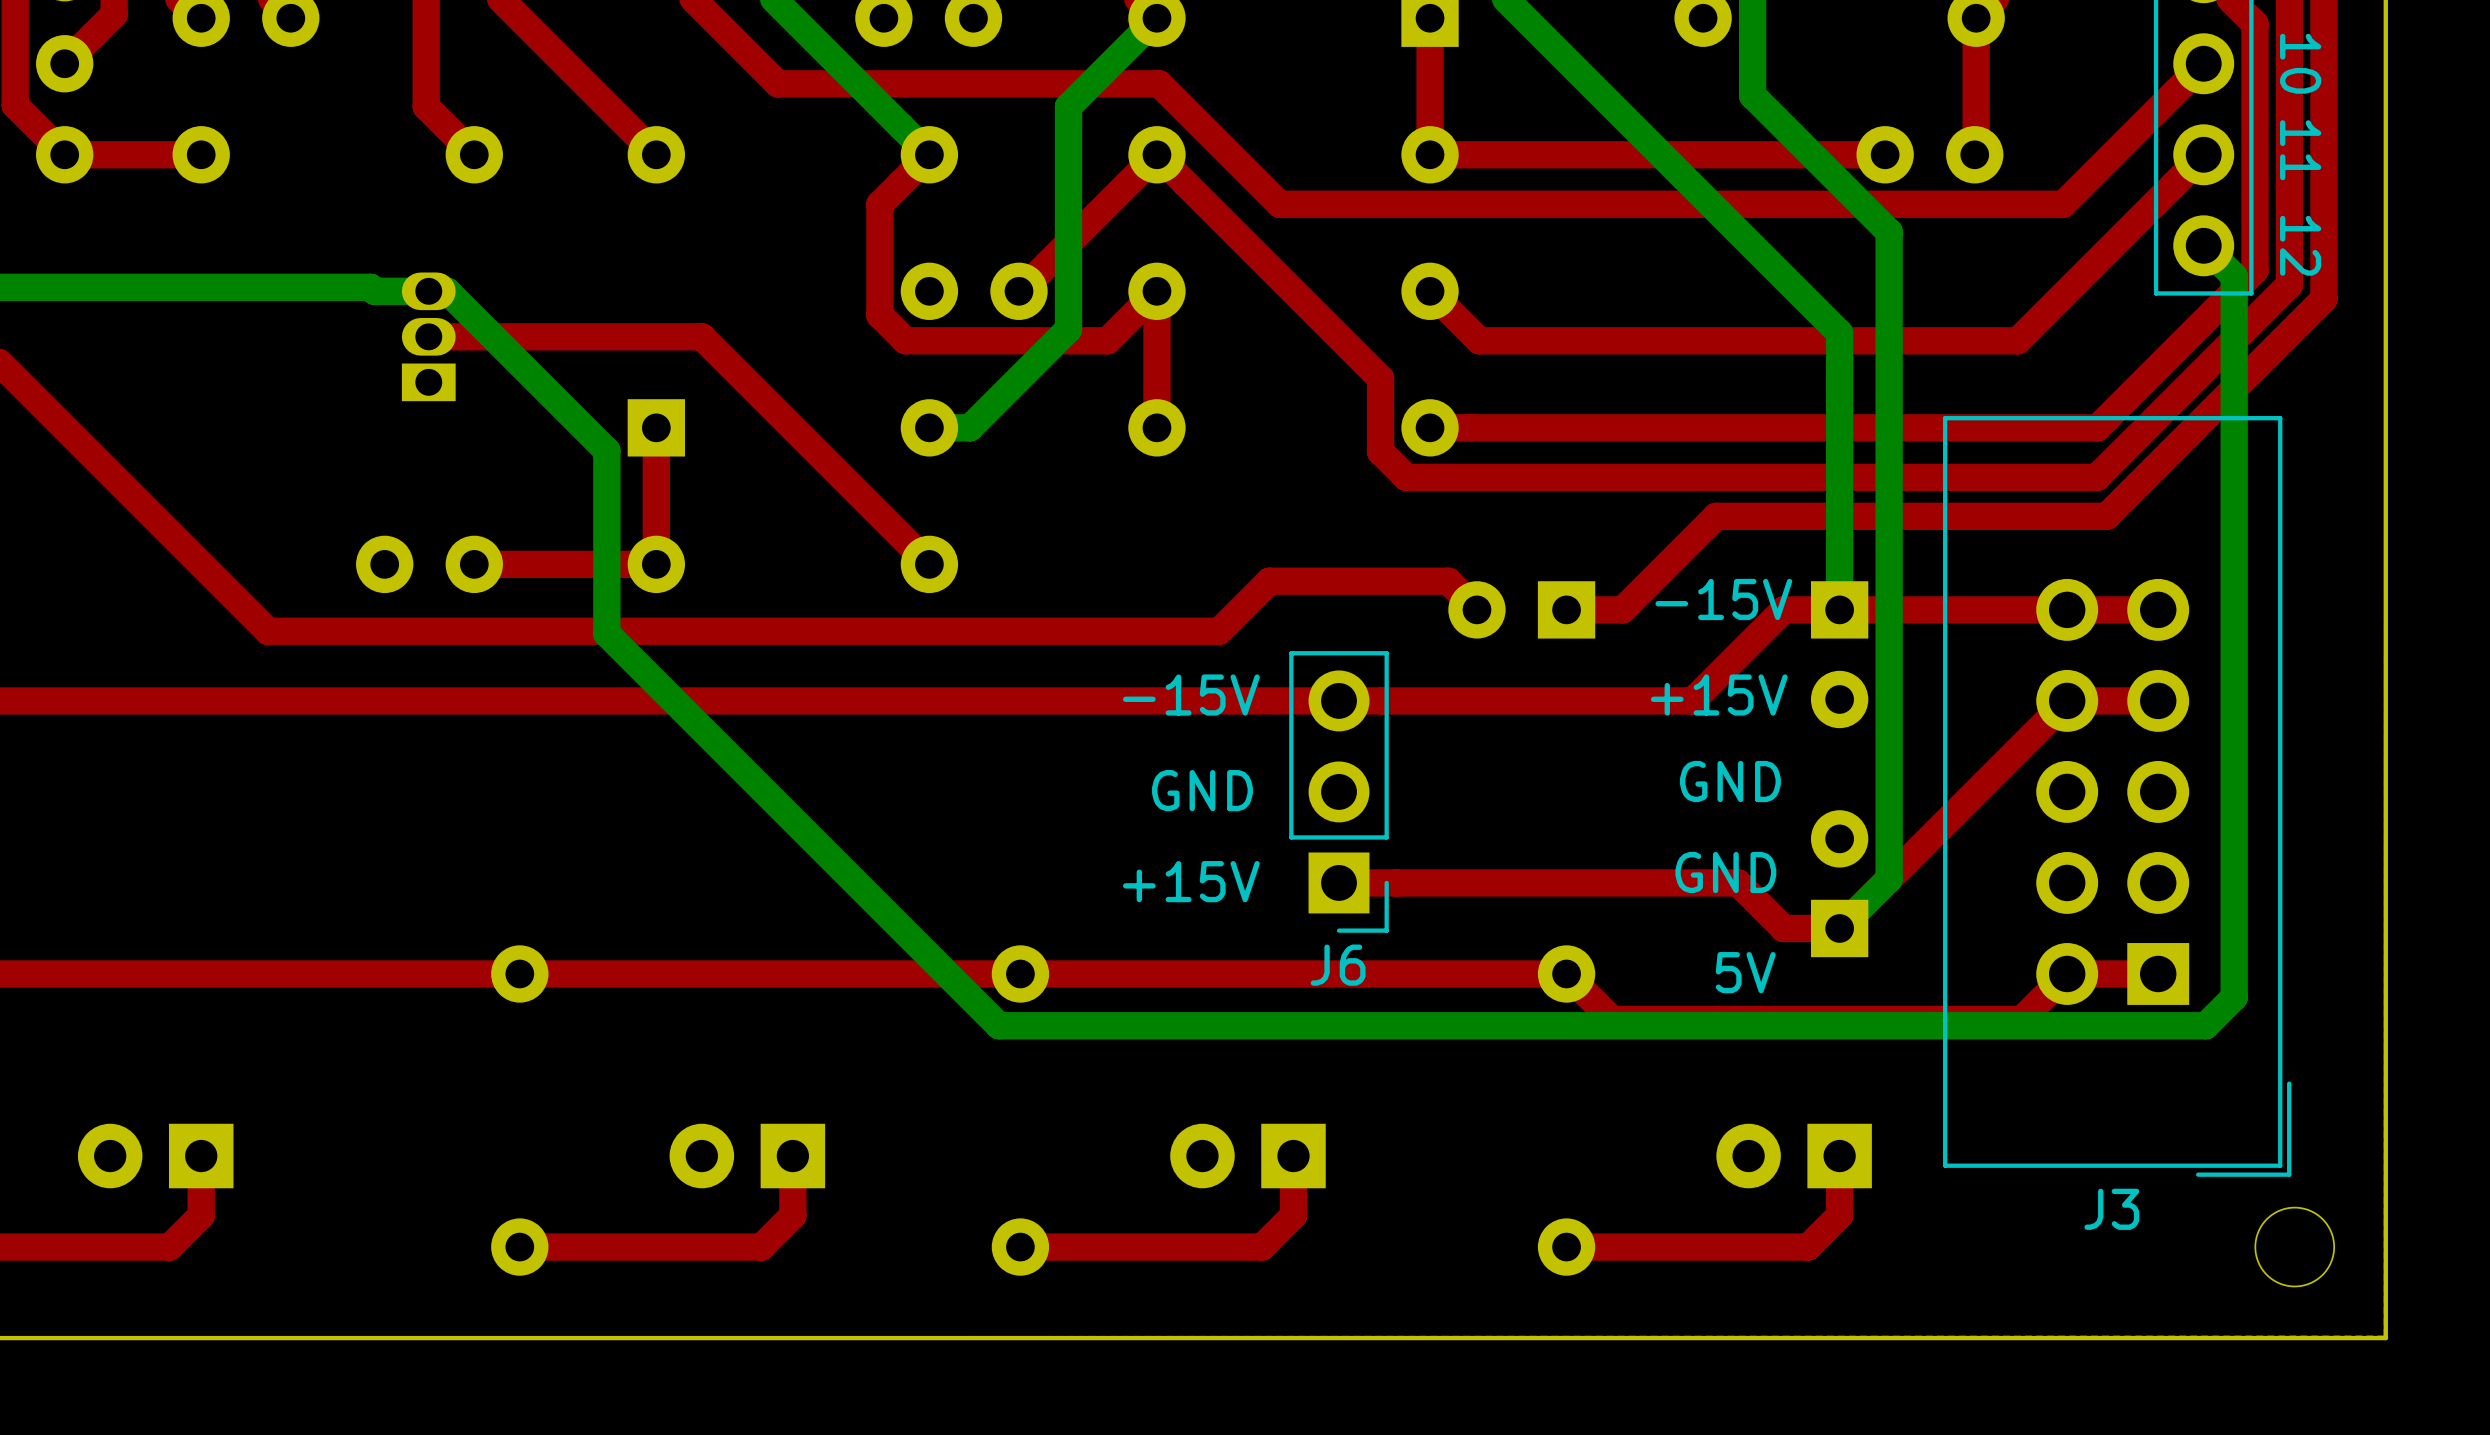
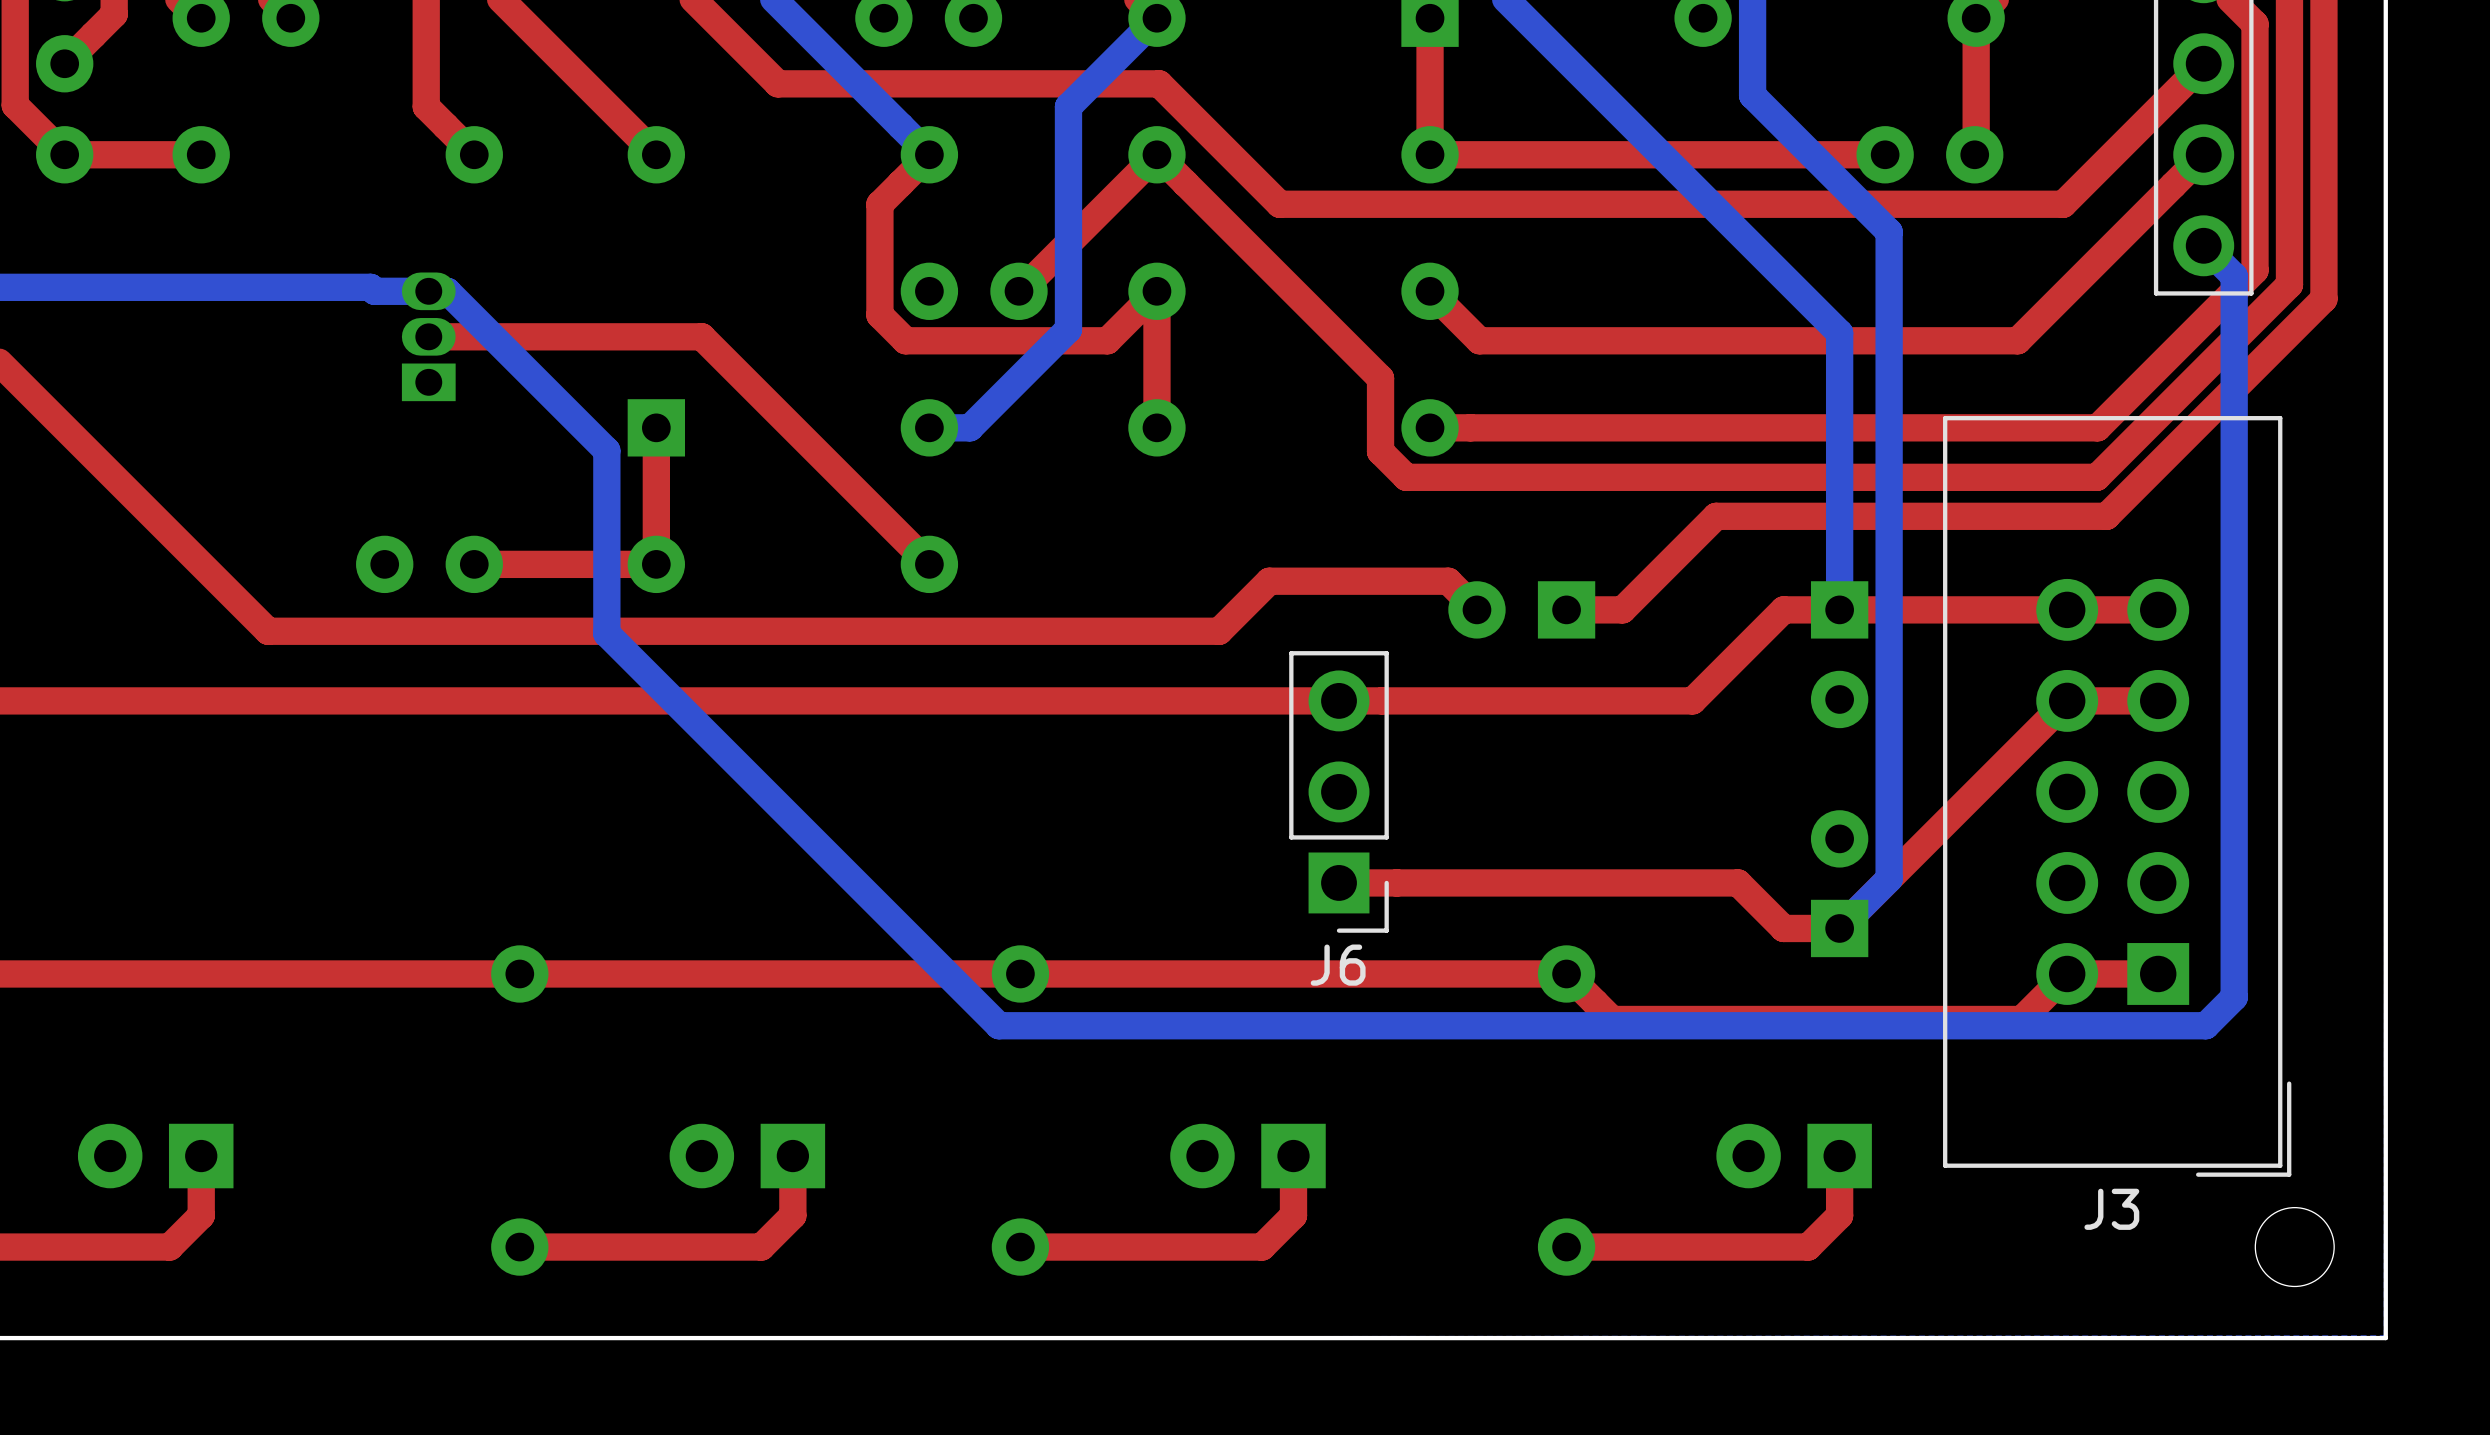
text: 10 (2300, 63) -> none
text: 11 (2300, 150) -> none
text: 12 (2300, 245) -> none
text: -15V (1723, 599) -> none
text: -15V (1191, 695) -> none
text: +15V (1719, 695) -> none
text: GND (1730, 781) -> none
text: GND (1202, 790) -> none
text: GND (1725, 872) -> none
text: +15V (1191, 881) -> none
text: 5V (1745, 972) -> none

